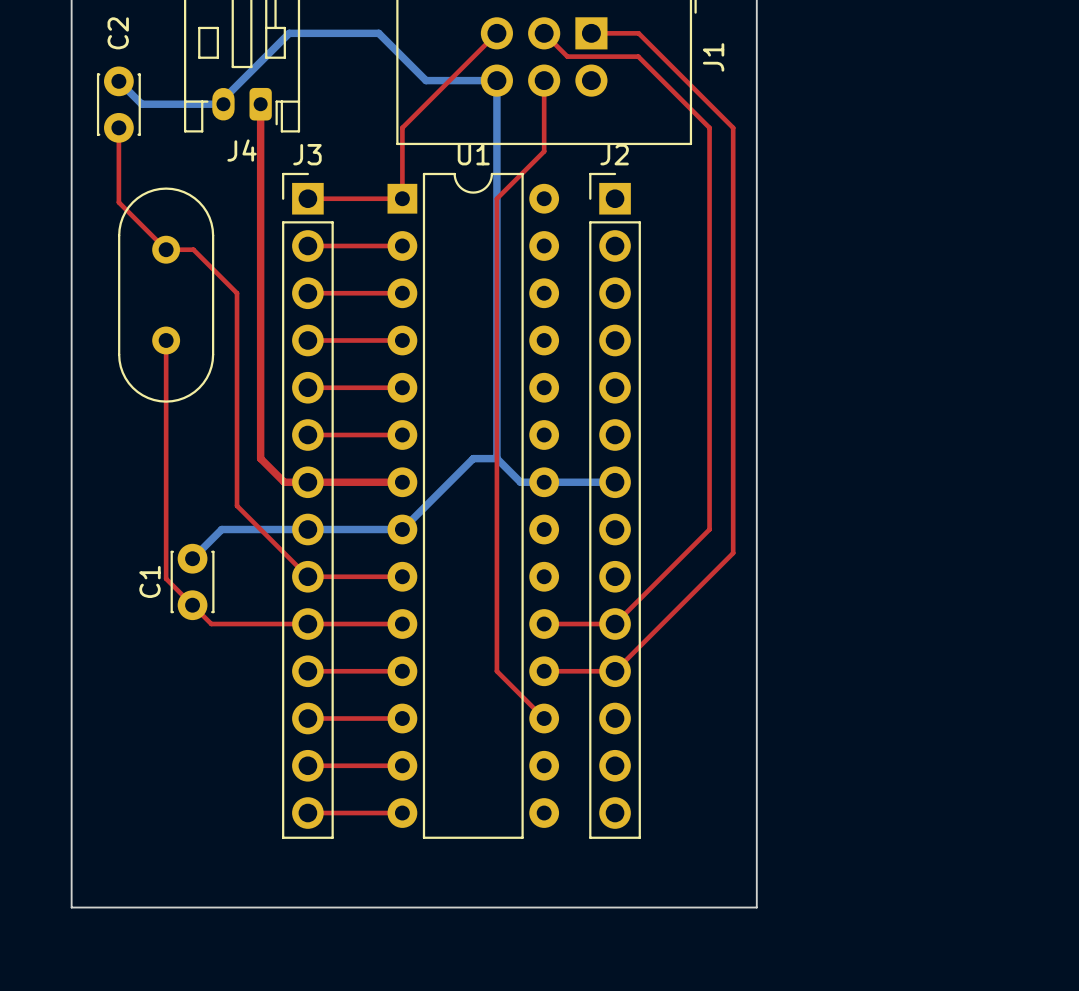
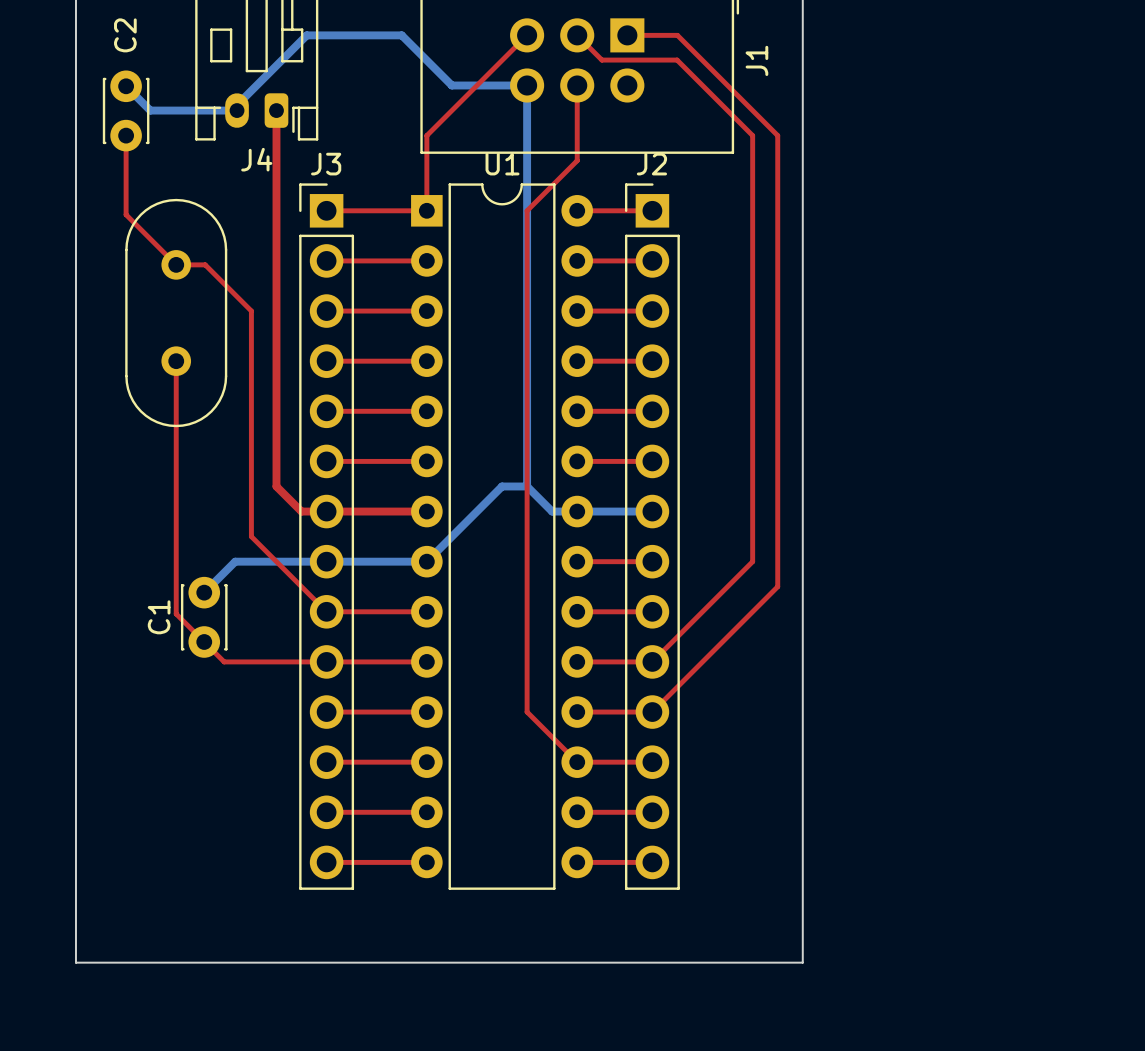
top track: none -> (577, 210) (652, 210)
top track: none -> (577, 260) (652, 260)
top track: none -> (577, 311) (652, 311)
top track: none -> (577, 361) (652, 361)
top track: none -> (577, 411) (652, 411)
top track: none -> (577, 461) (652, 461)
top track: none -> (577, 561) (652, 561)
top track: none -> (577, 611) (652, 611)
top track: none -> (577, 762) (652, 762)
top track: none -> (577, 812) (652, 812)
top track: none -> (577, 862) (652, 862)

